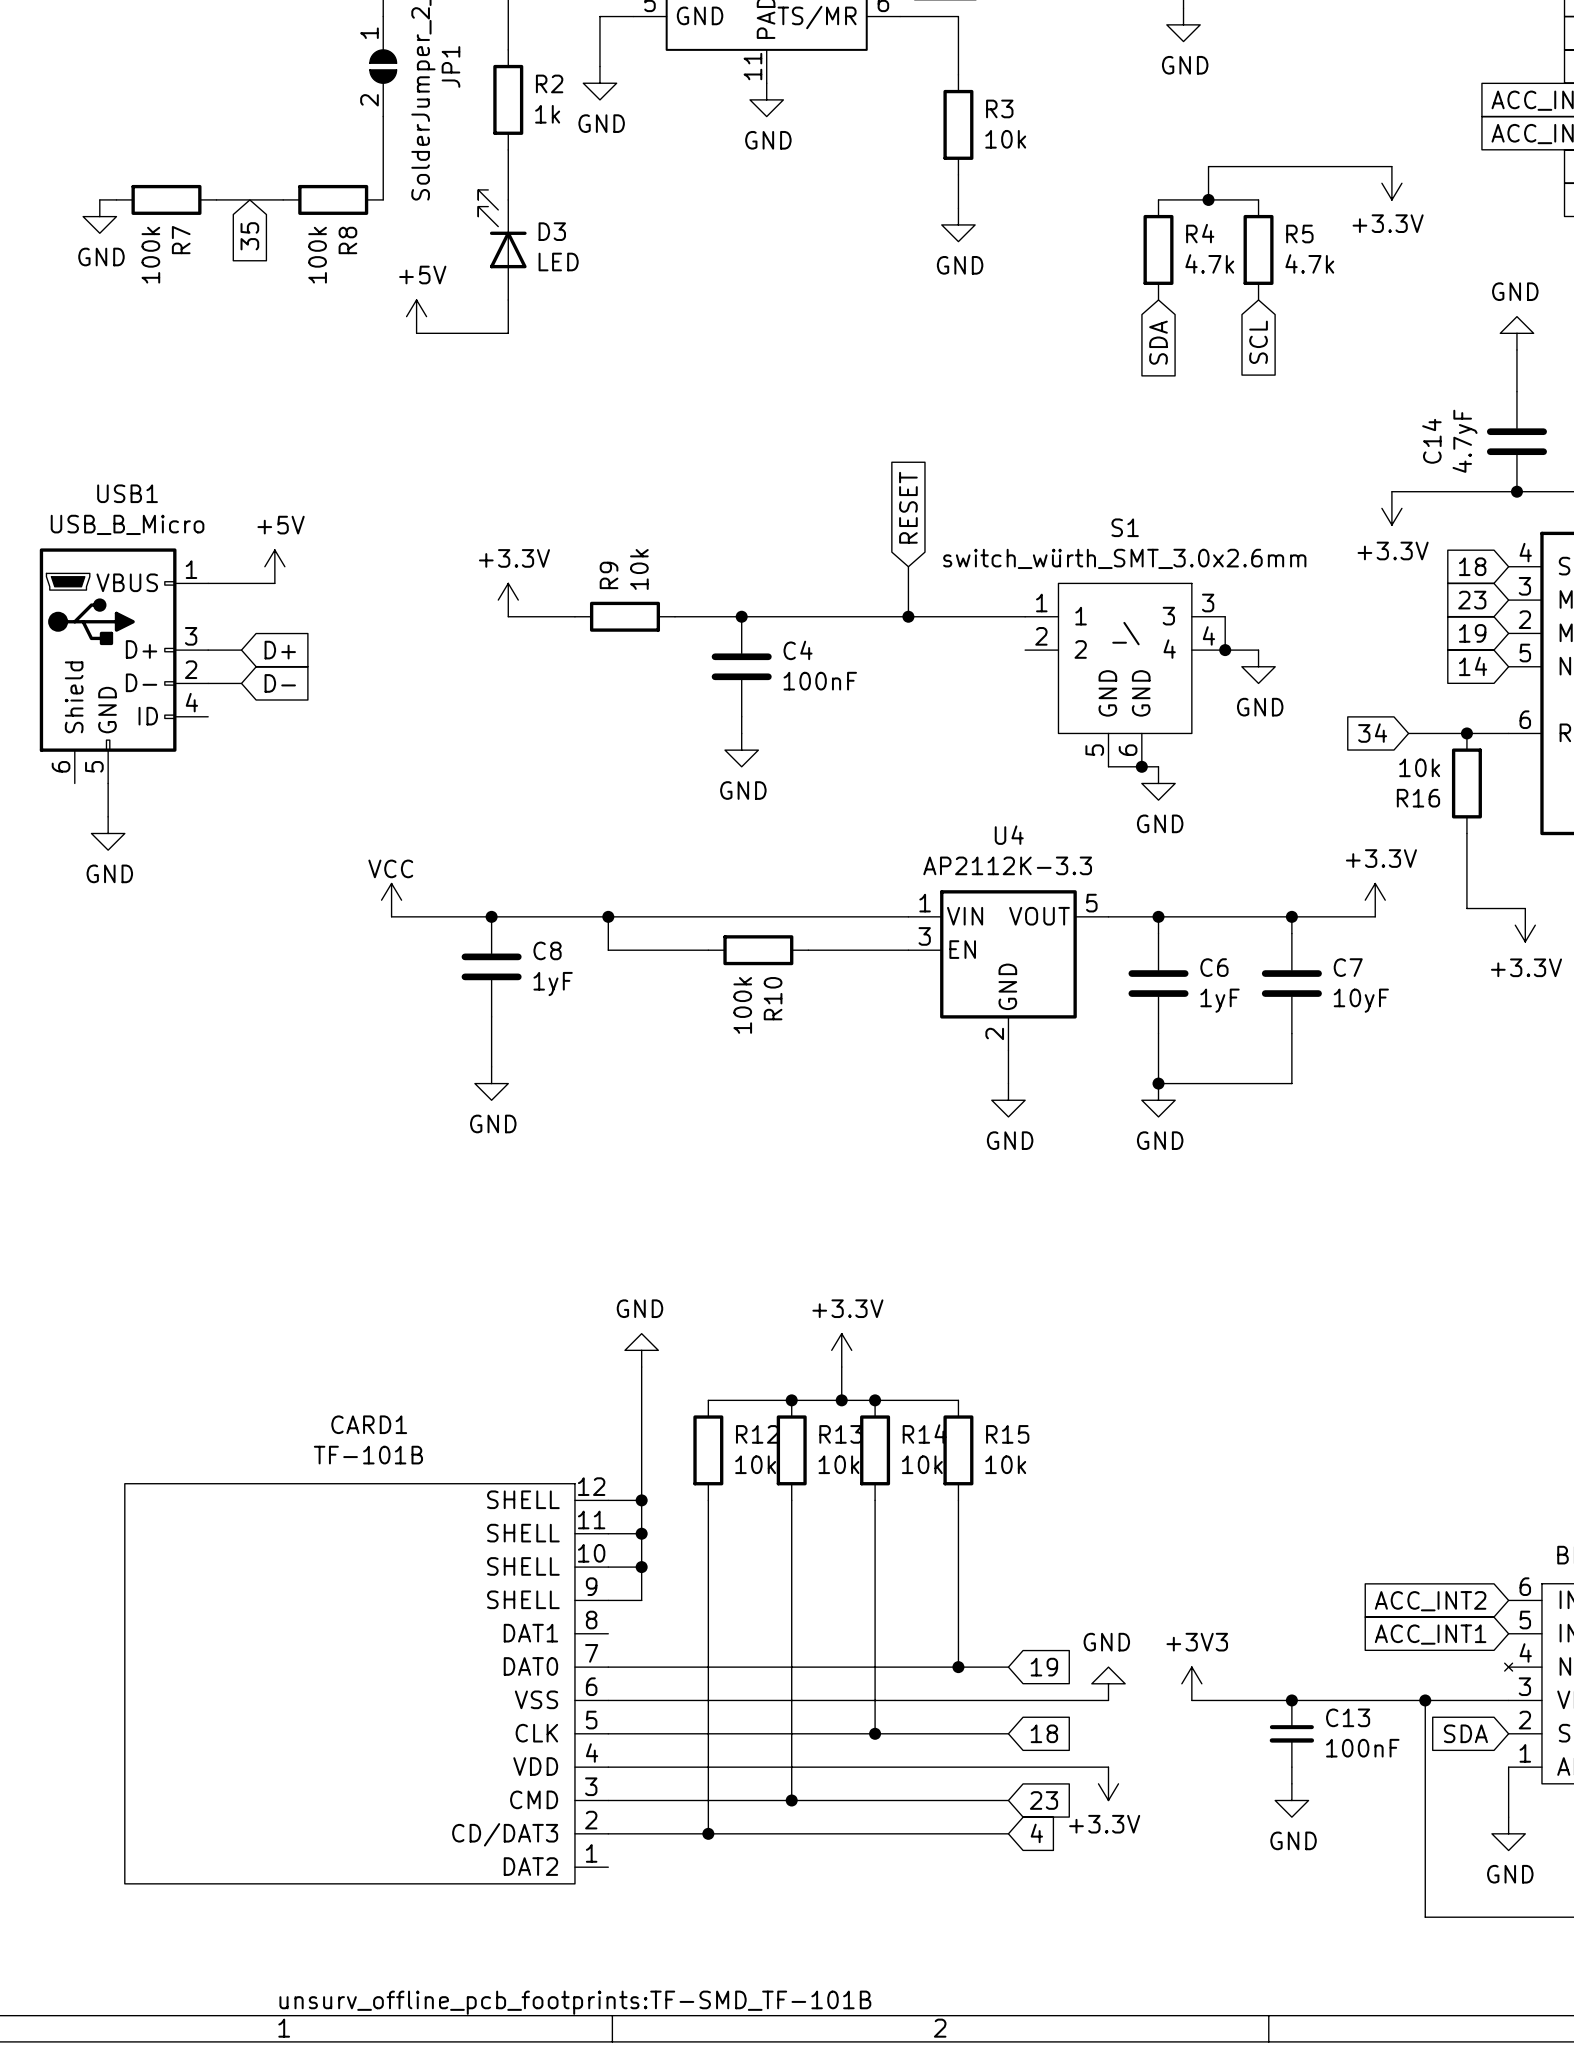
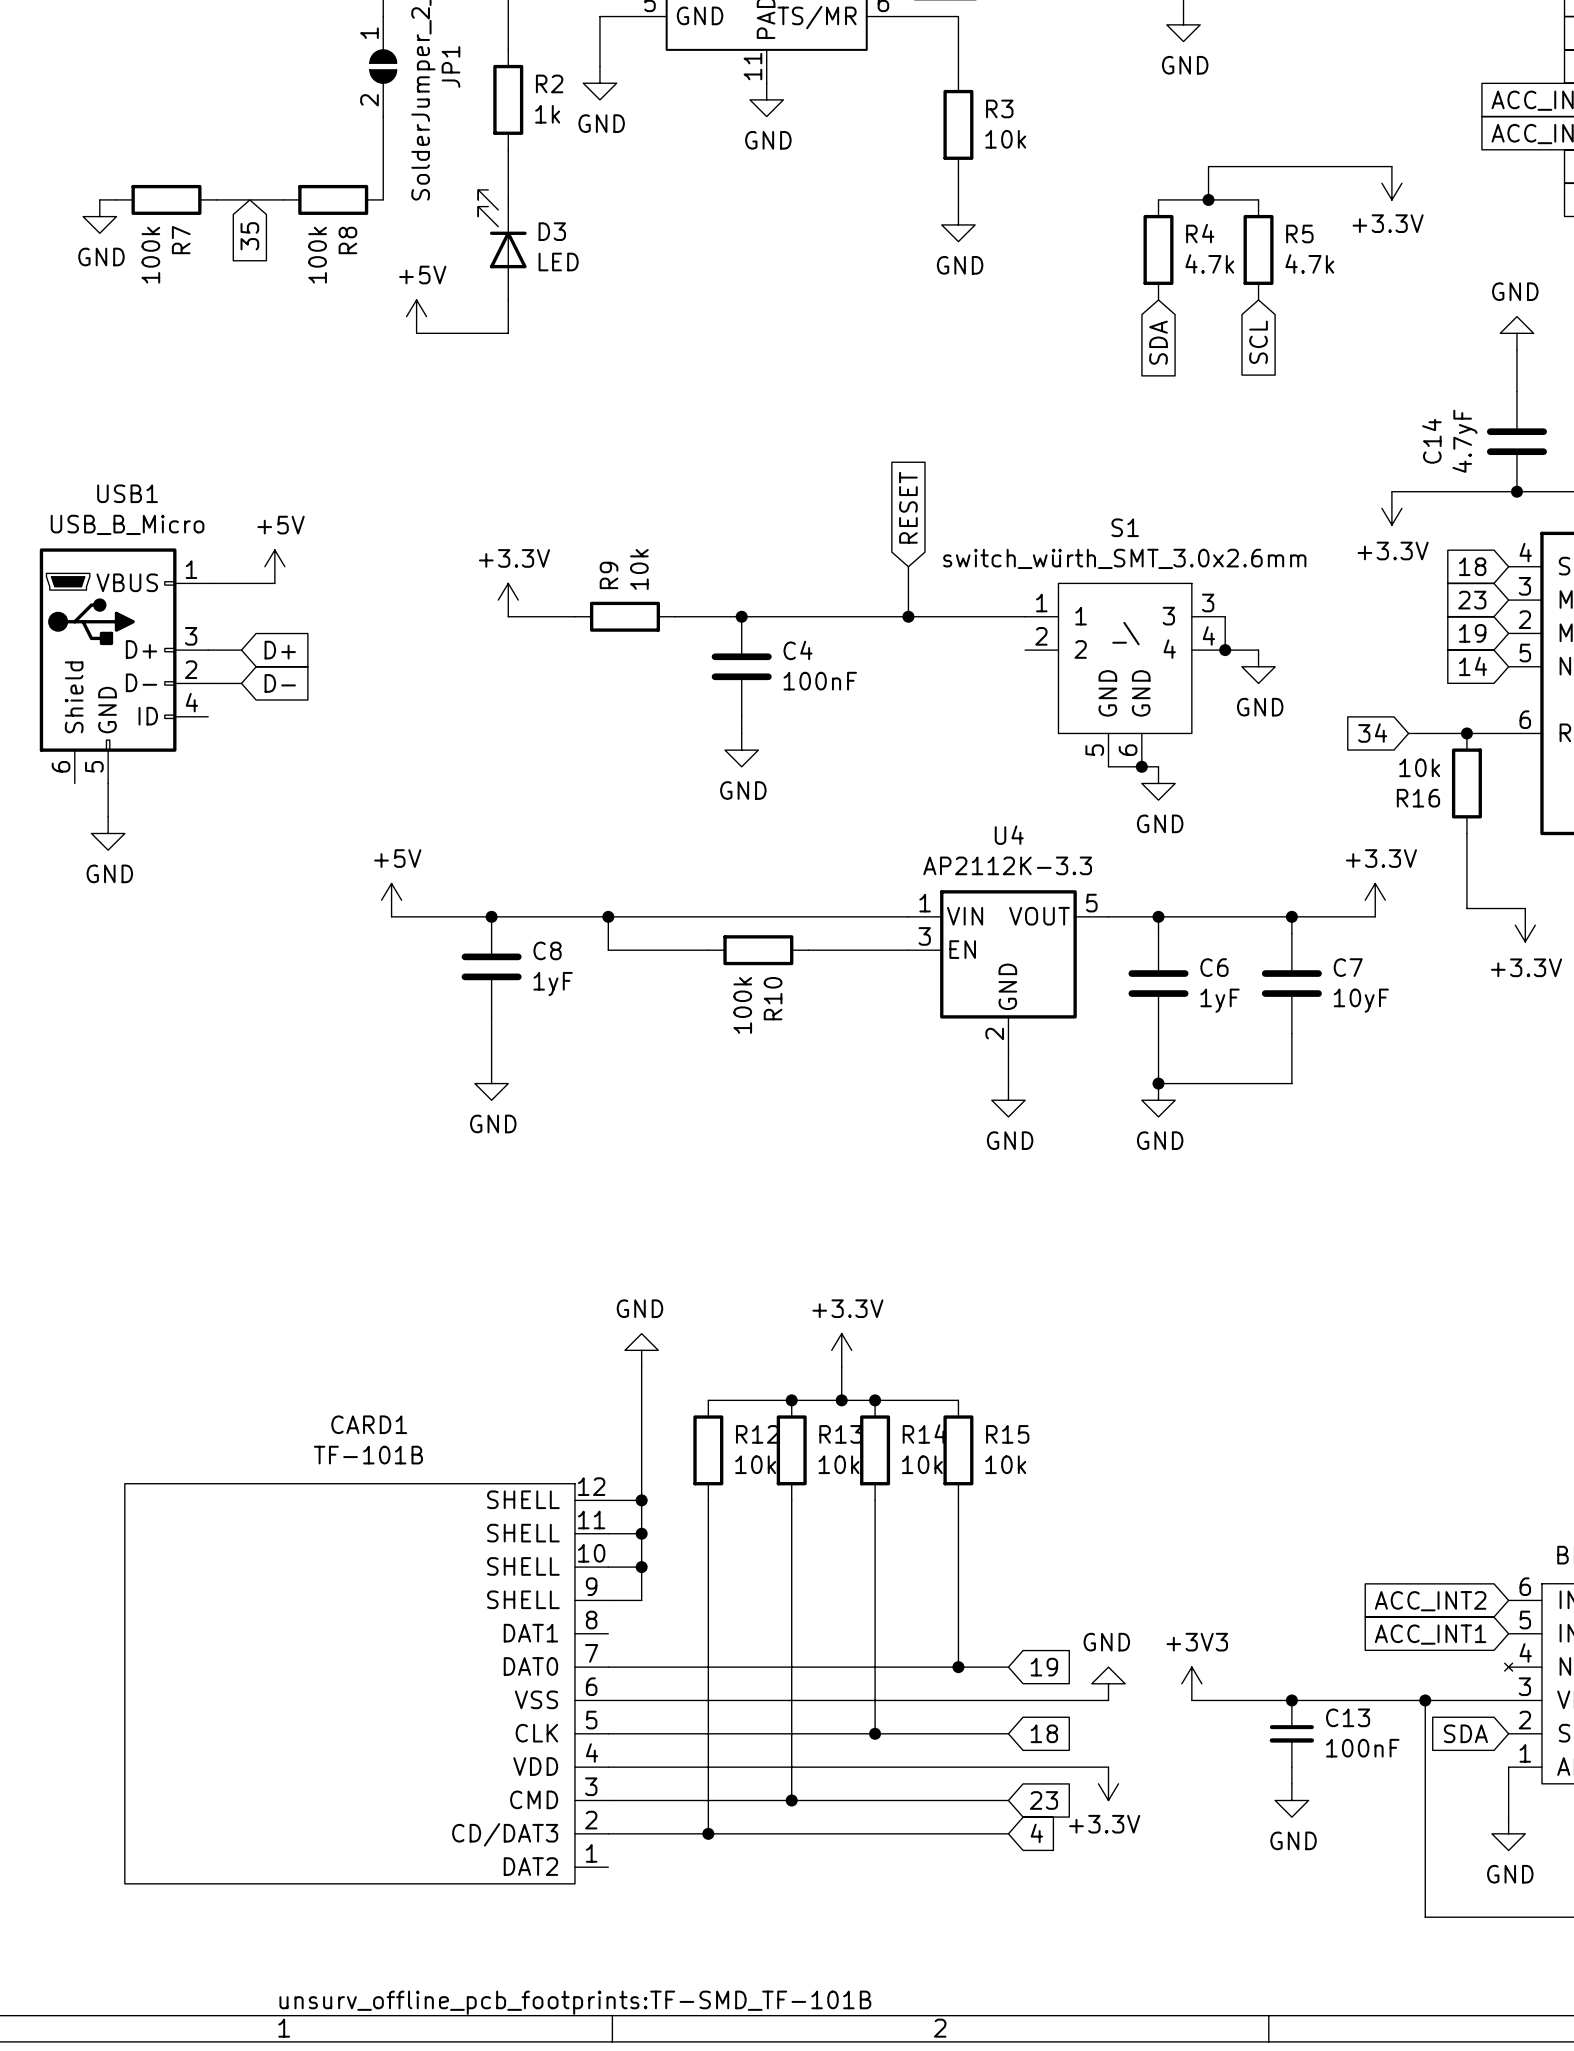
power symbol: VCC (391, 900) -> +5V (391, 900)

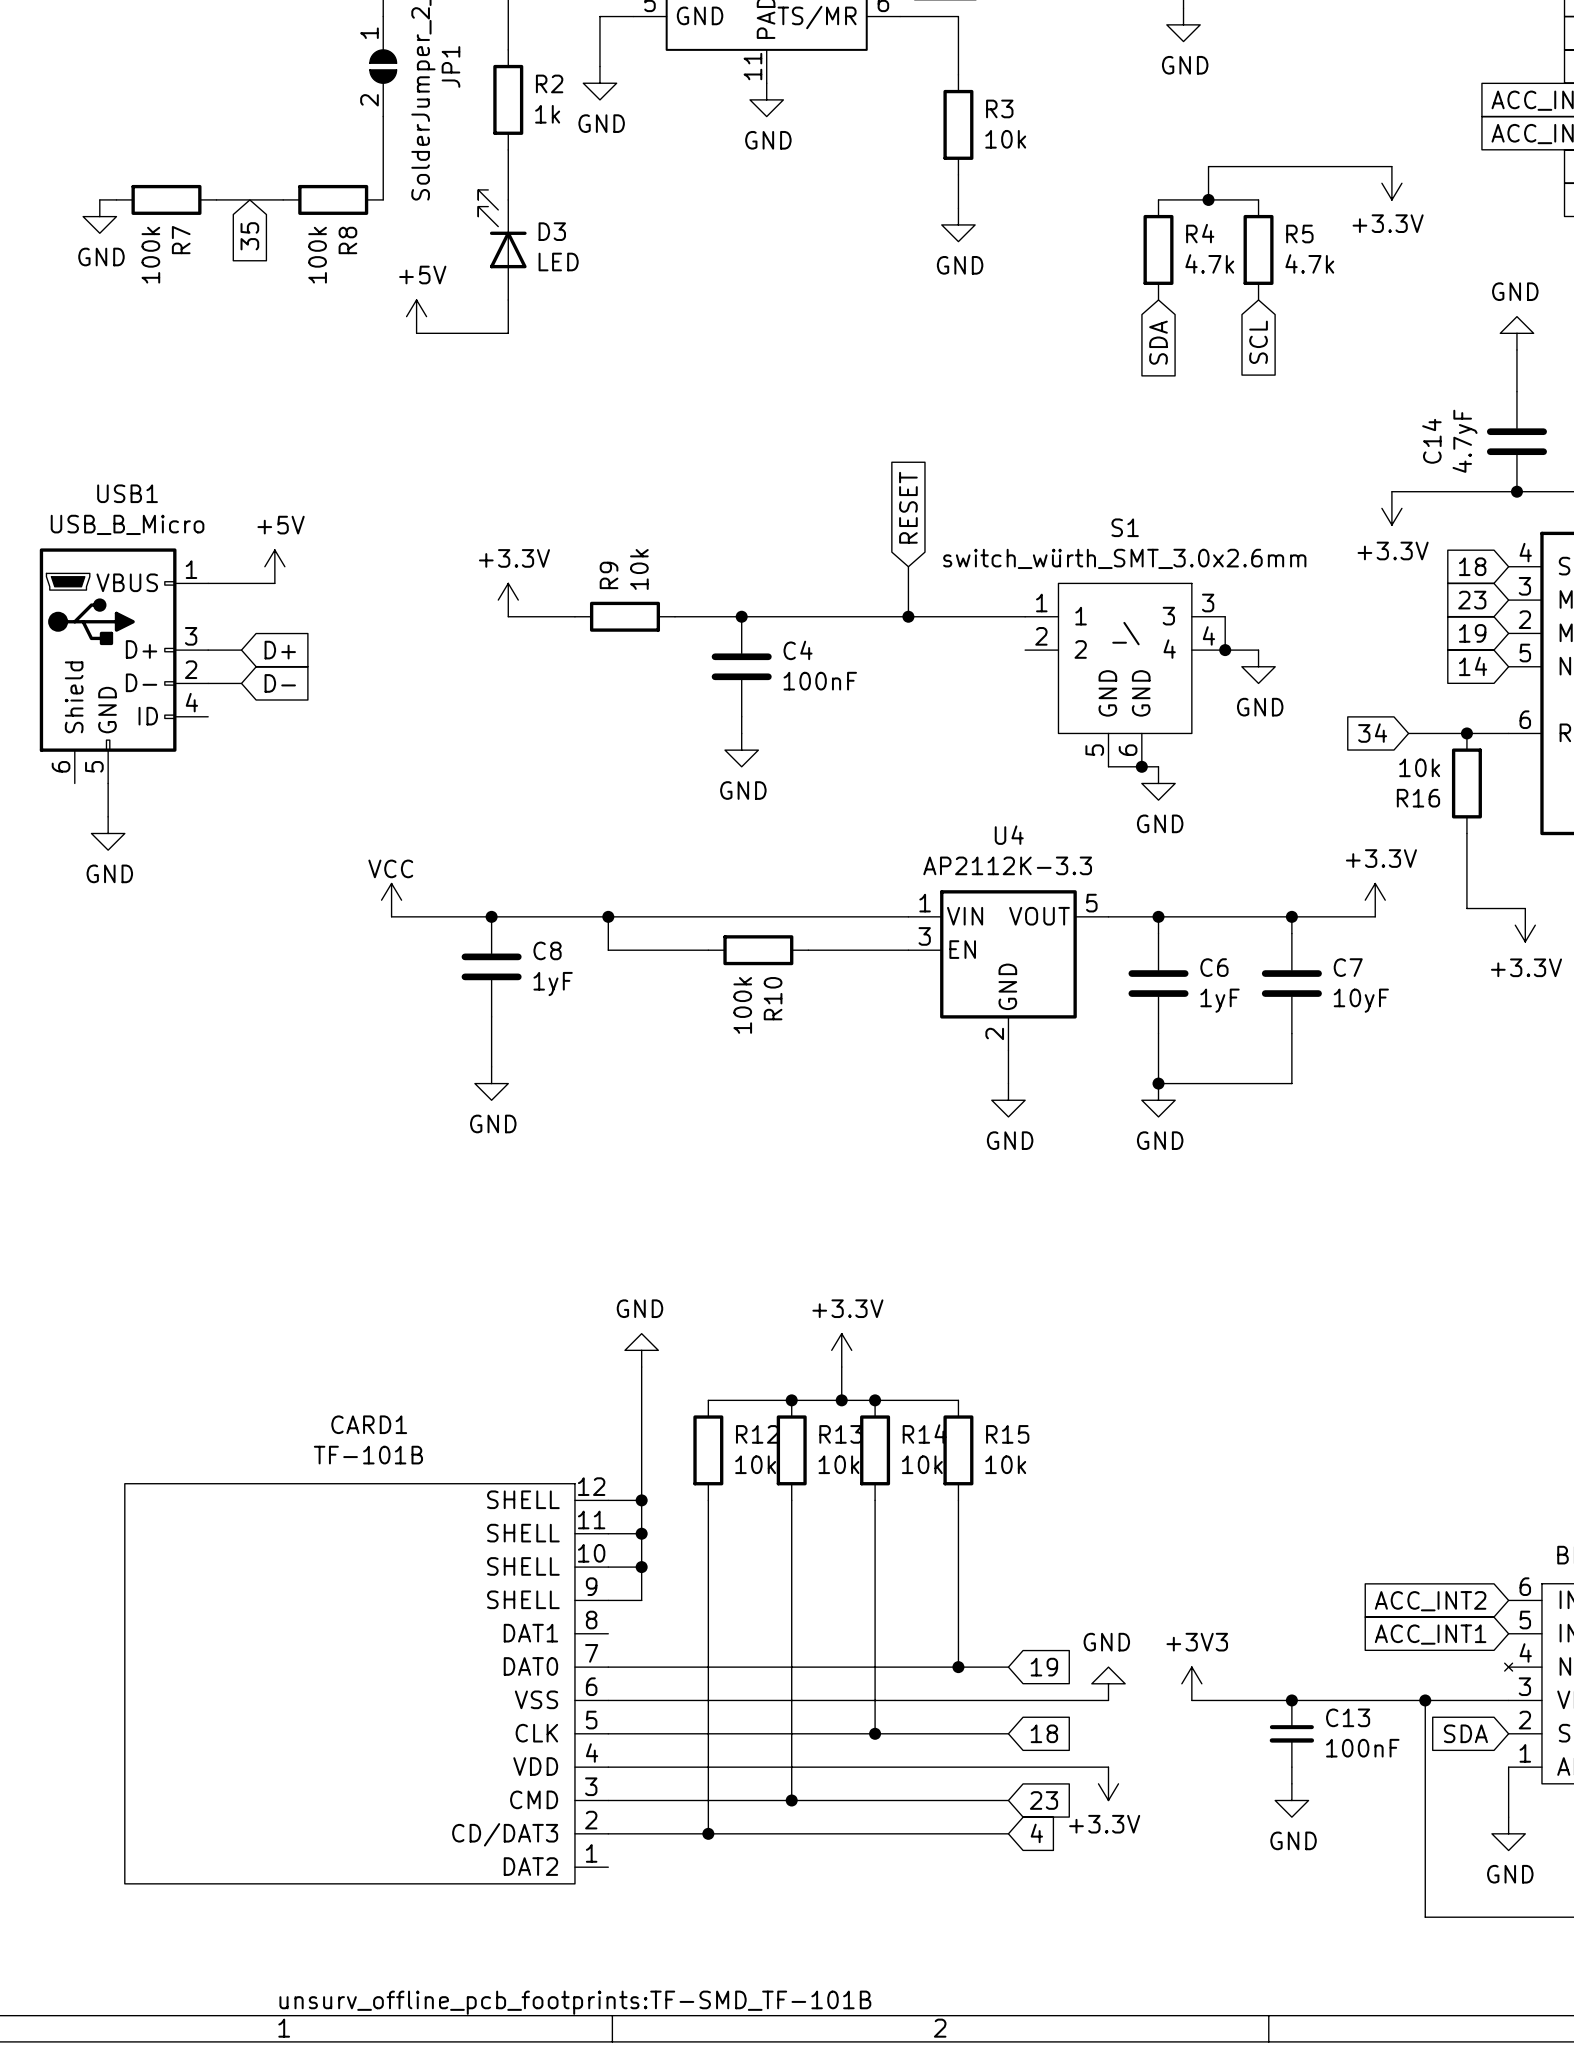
power symbol: +5V (391, 900) -> VCC (391, 900)

